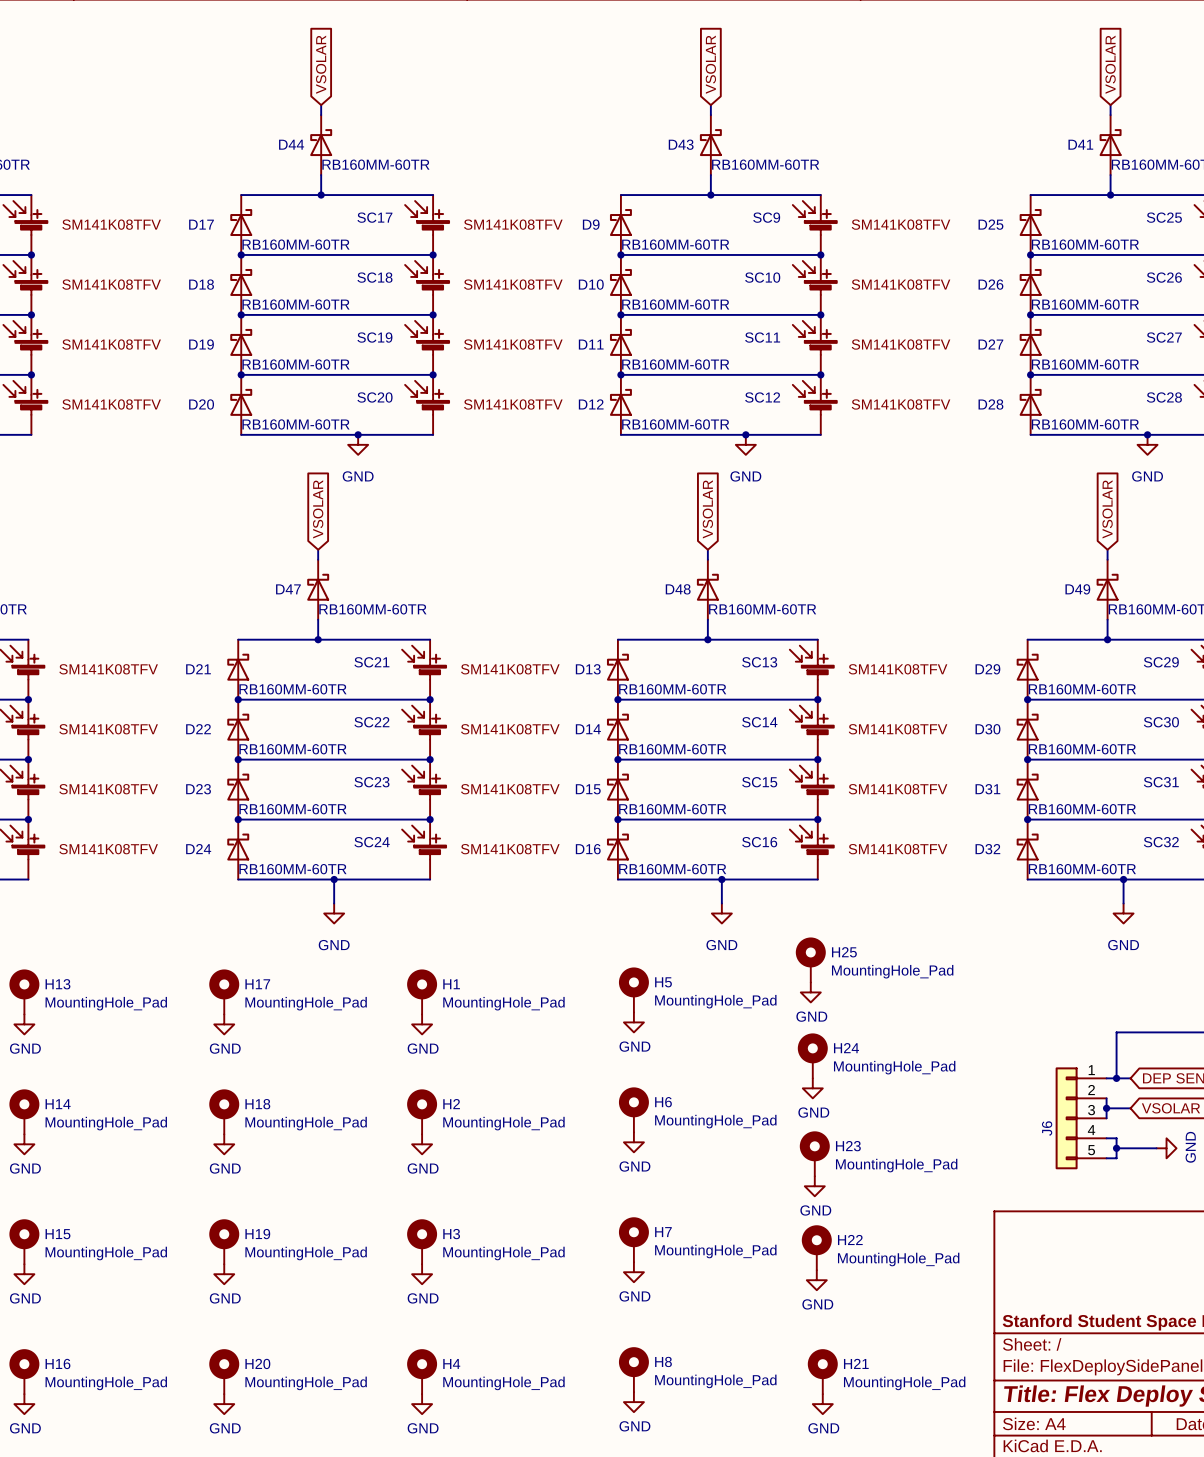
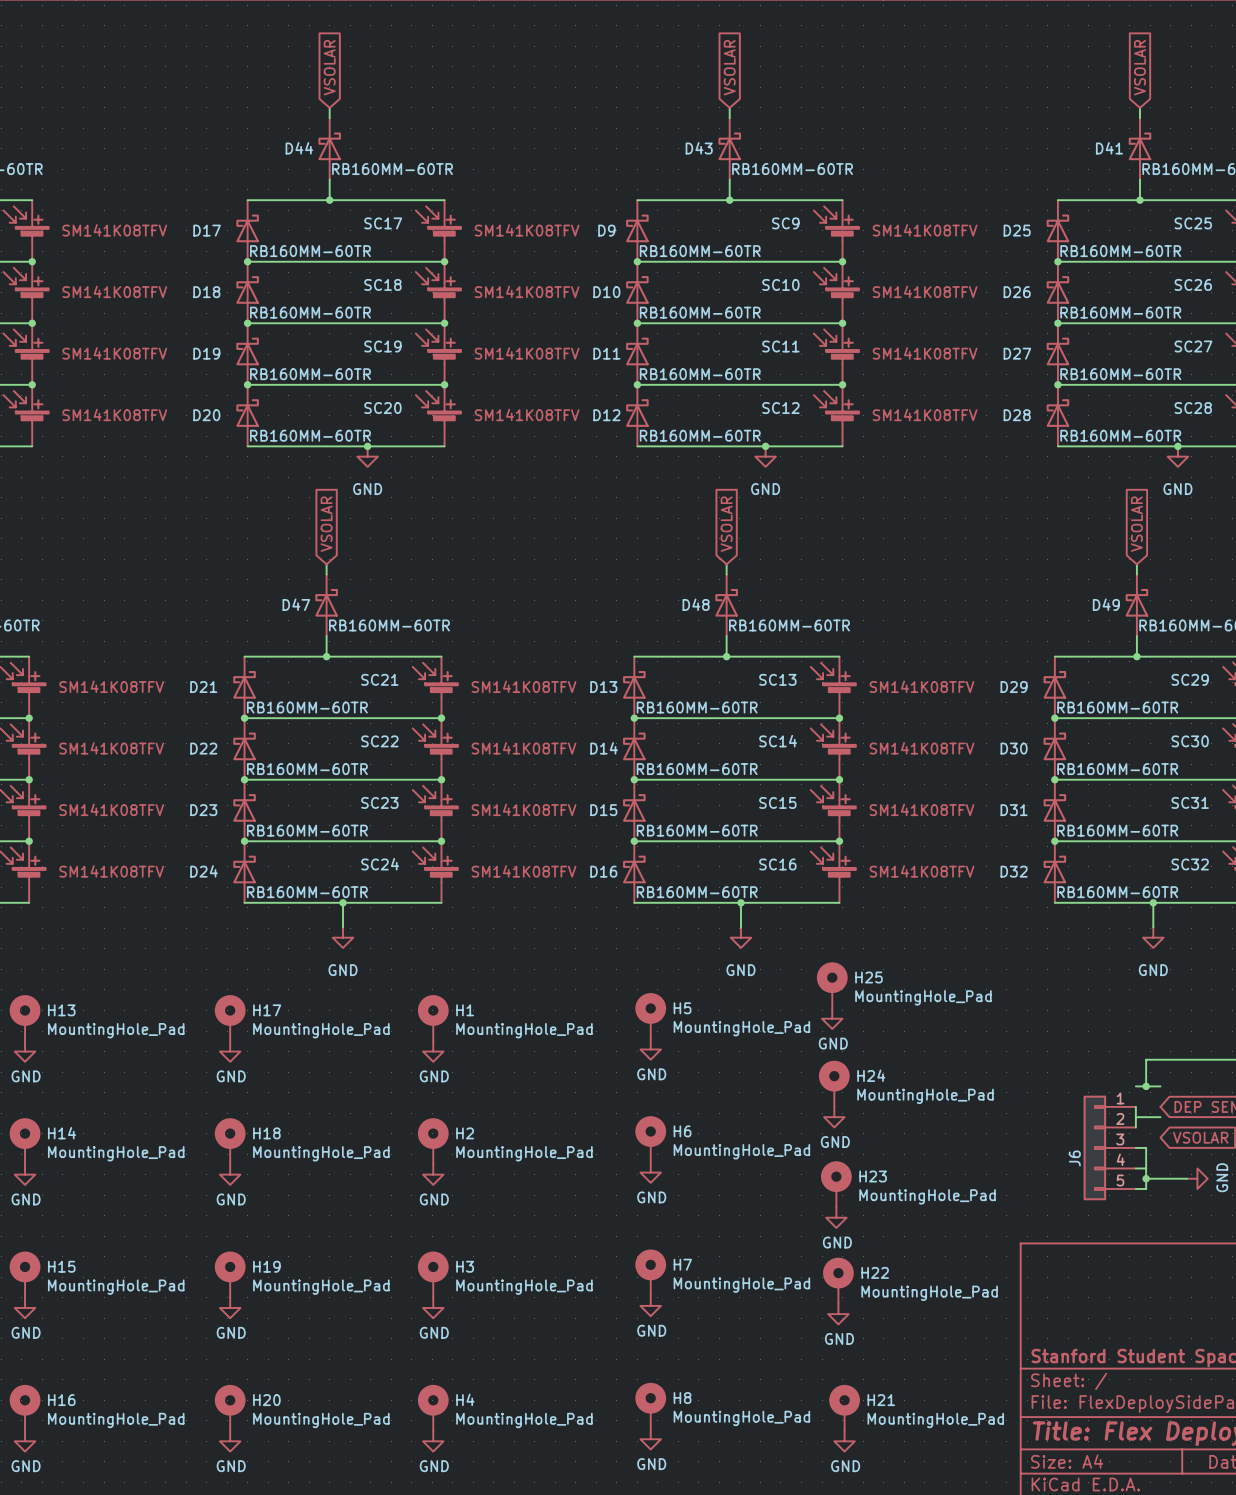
wire: none -> (1135, 1086) (1160, 1086)
wire: (1116, 1058) (1116, 1078) -> none
wire: (1106, 1078) (1130, 1078) -> (1135, 1106) (1135, 1127)
junction position: (1116, 1078) -> (1146, 1086)
wire: (1106, 1098) (1106, 1118) -> (1146, 1168) (1146, 1147) (1135, 1147)
wire: (1106, 1108) (1130, 1108) -> (1135, 1117) (1160, 1117)
junction: (1106, 1108) -> none

